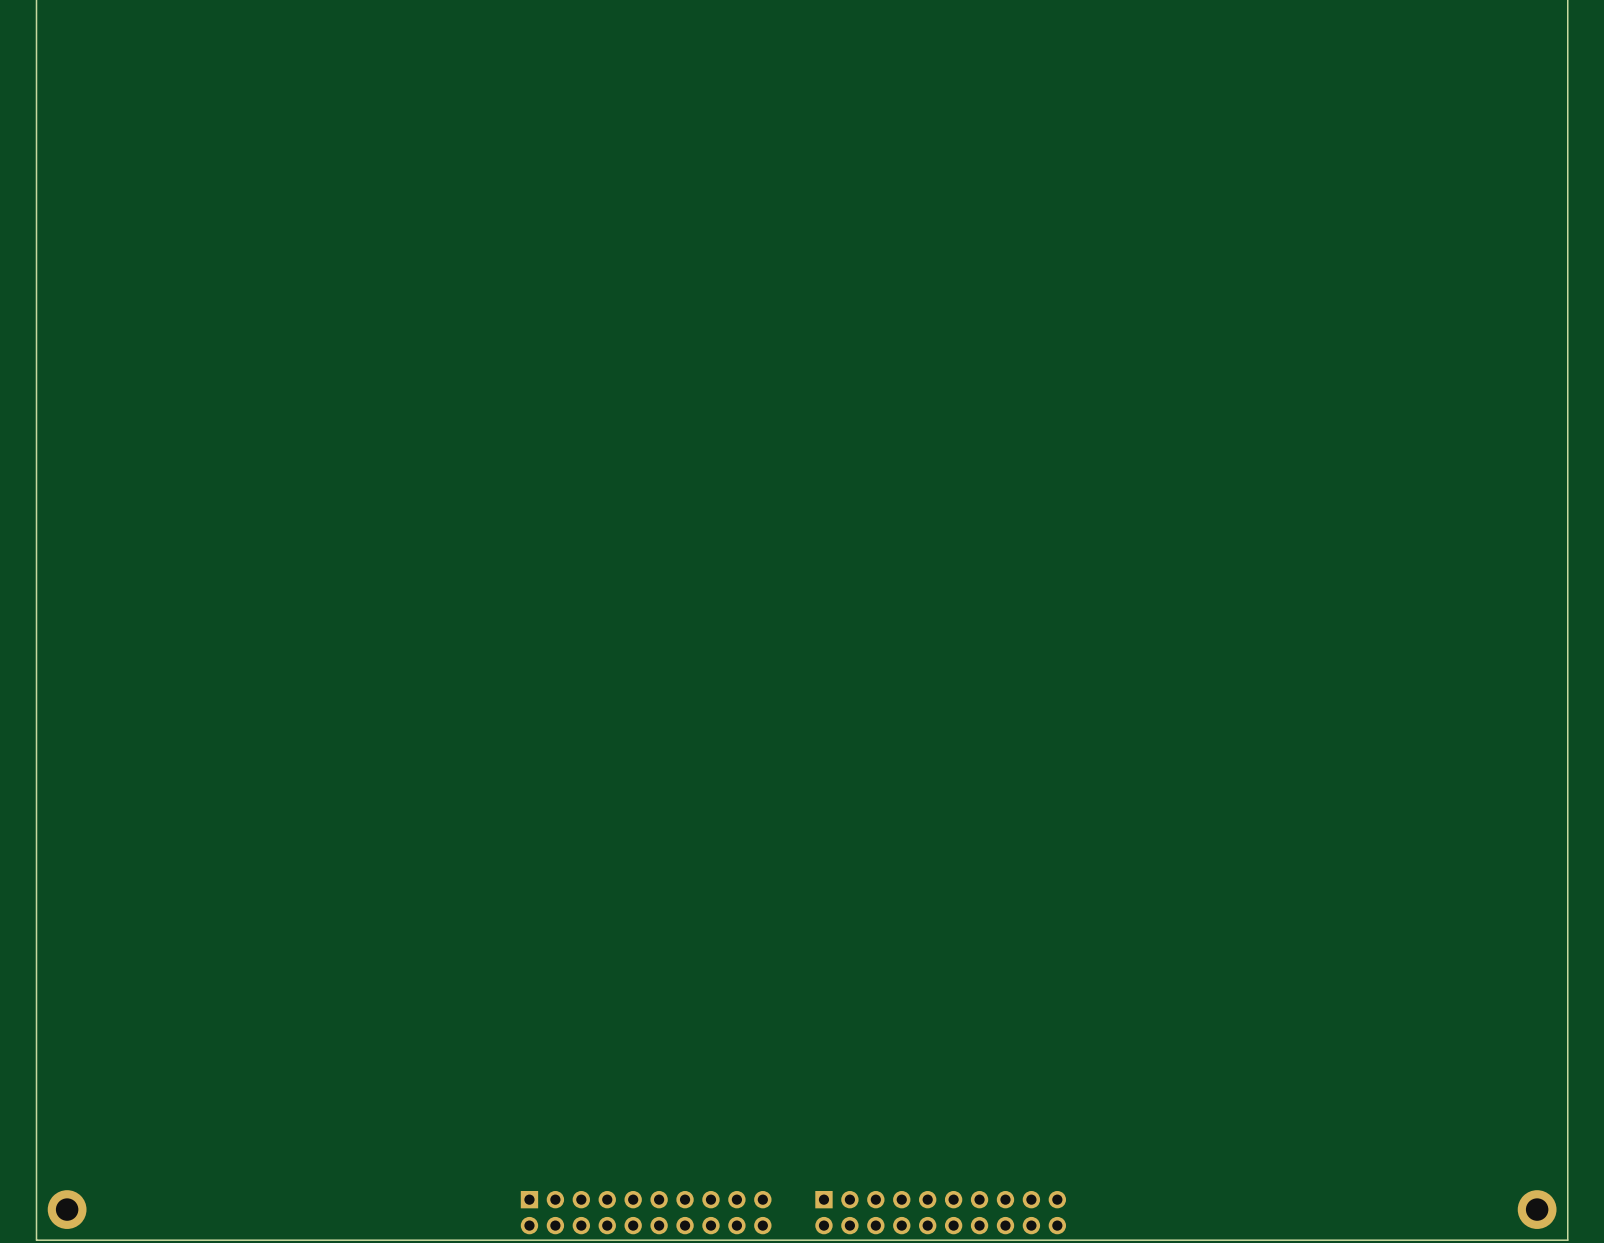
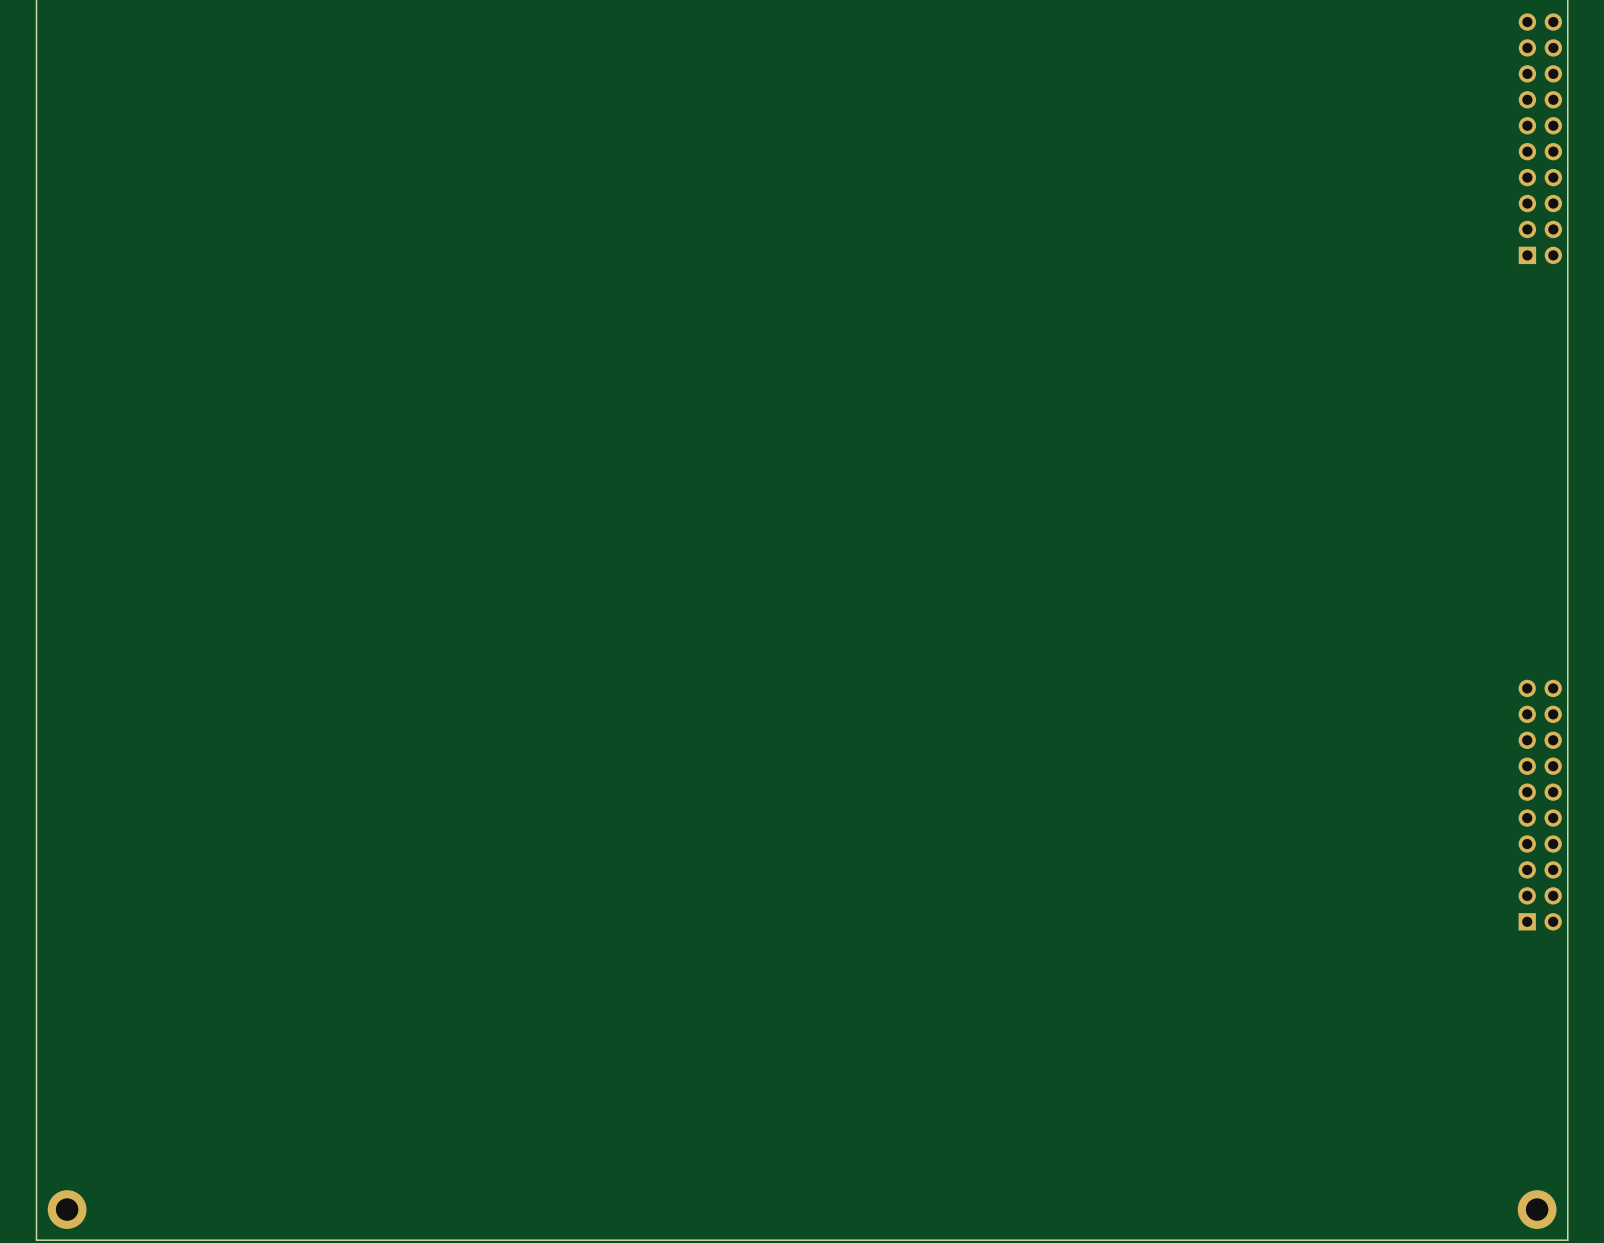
part: none -> (1540, 138)
part: none -> (1540, 805)
part: (646, 1212) -> none
part: (940, 1212) -> none

